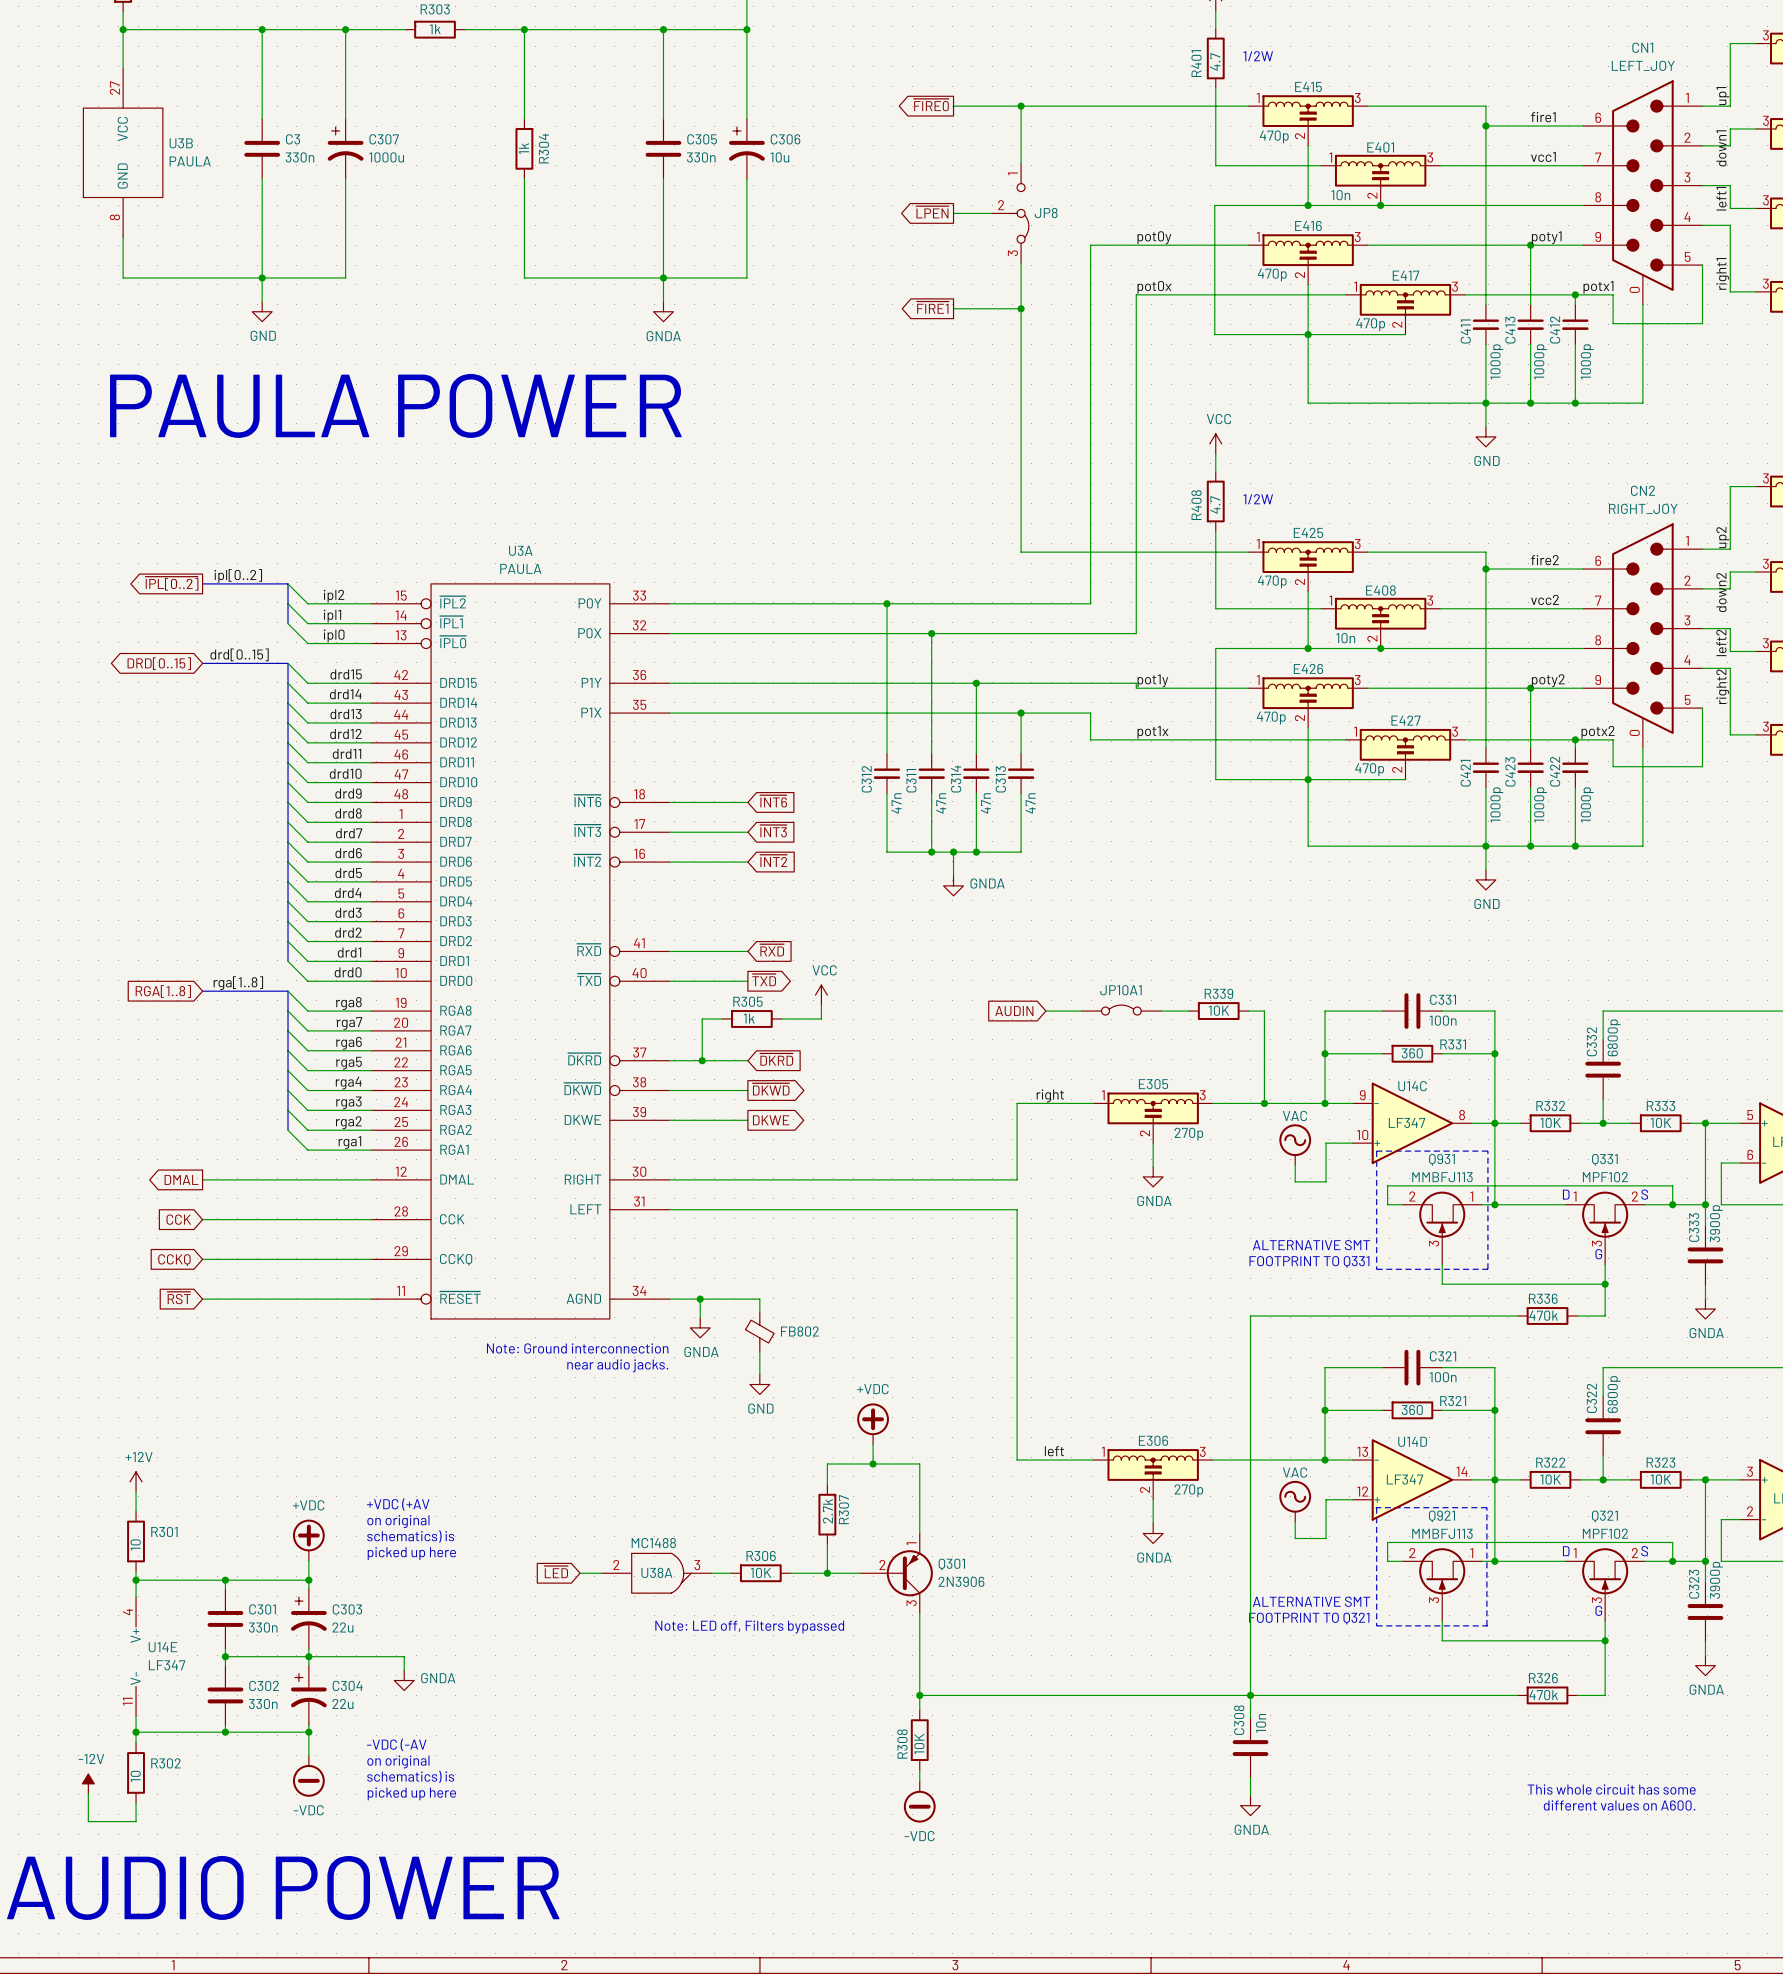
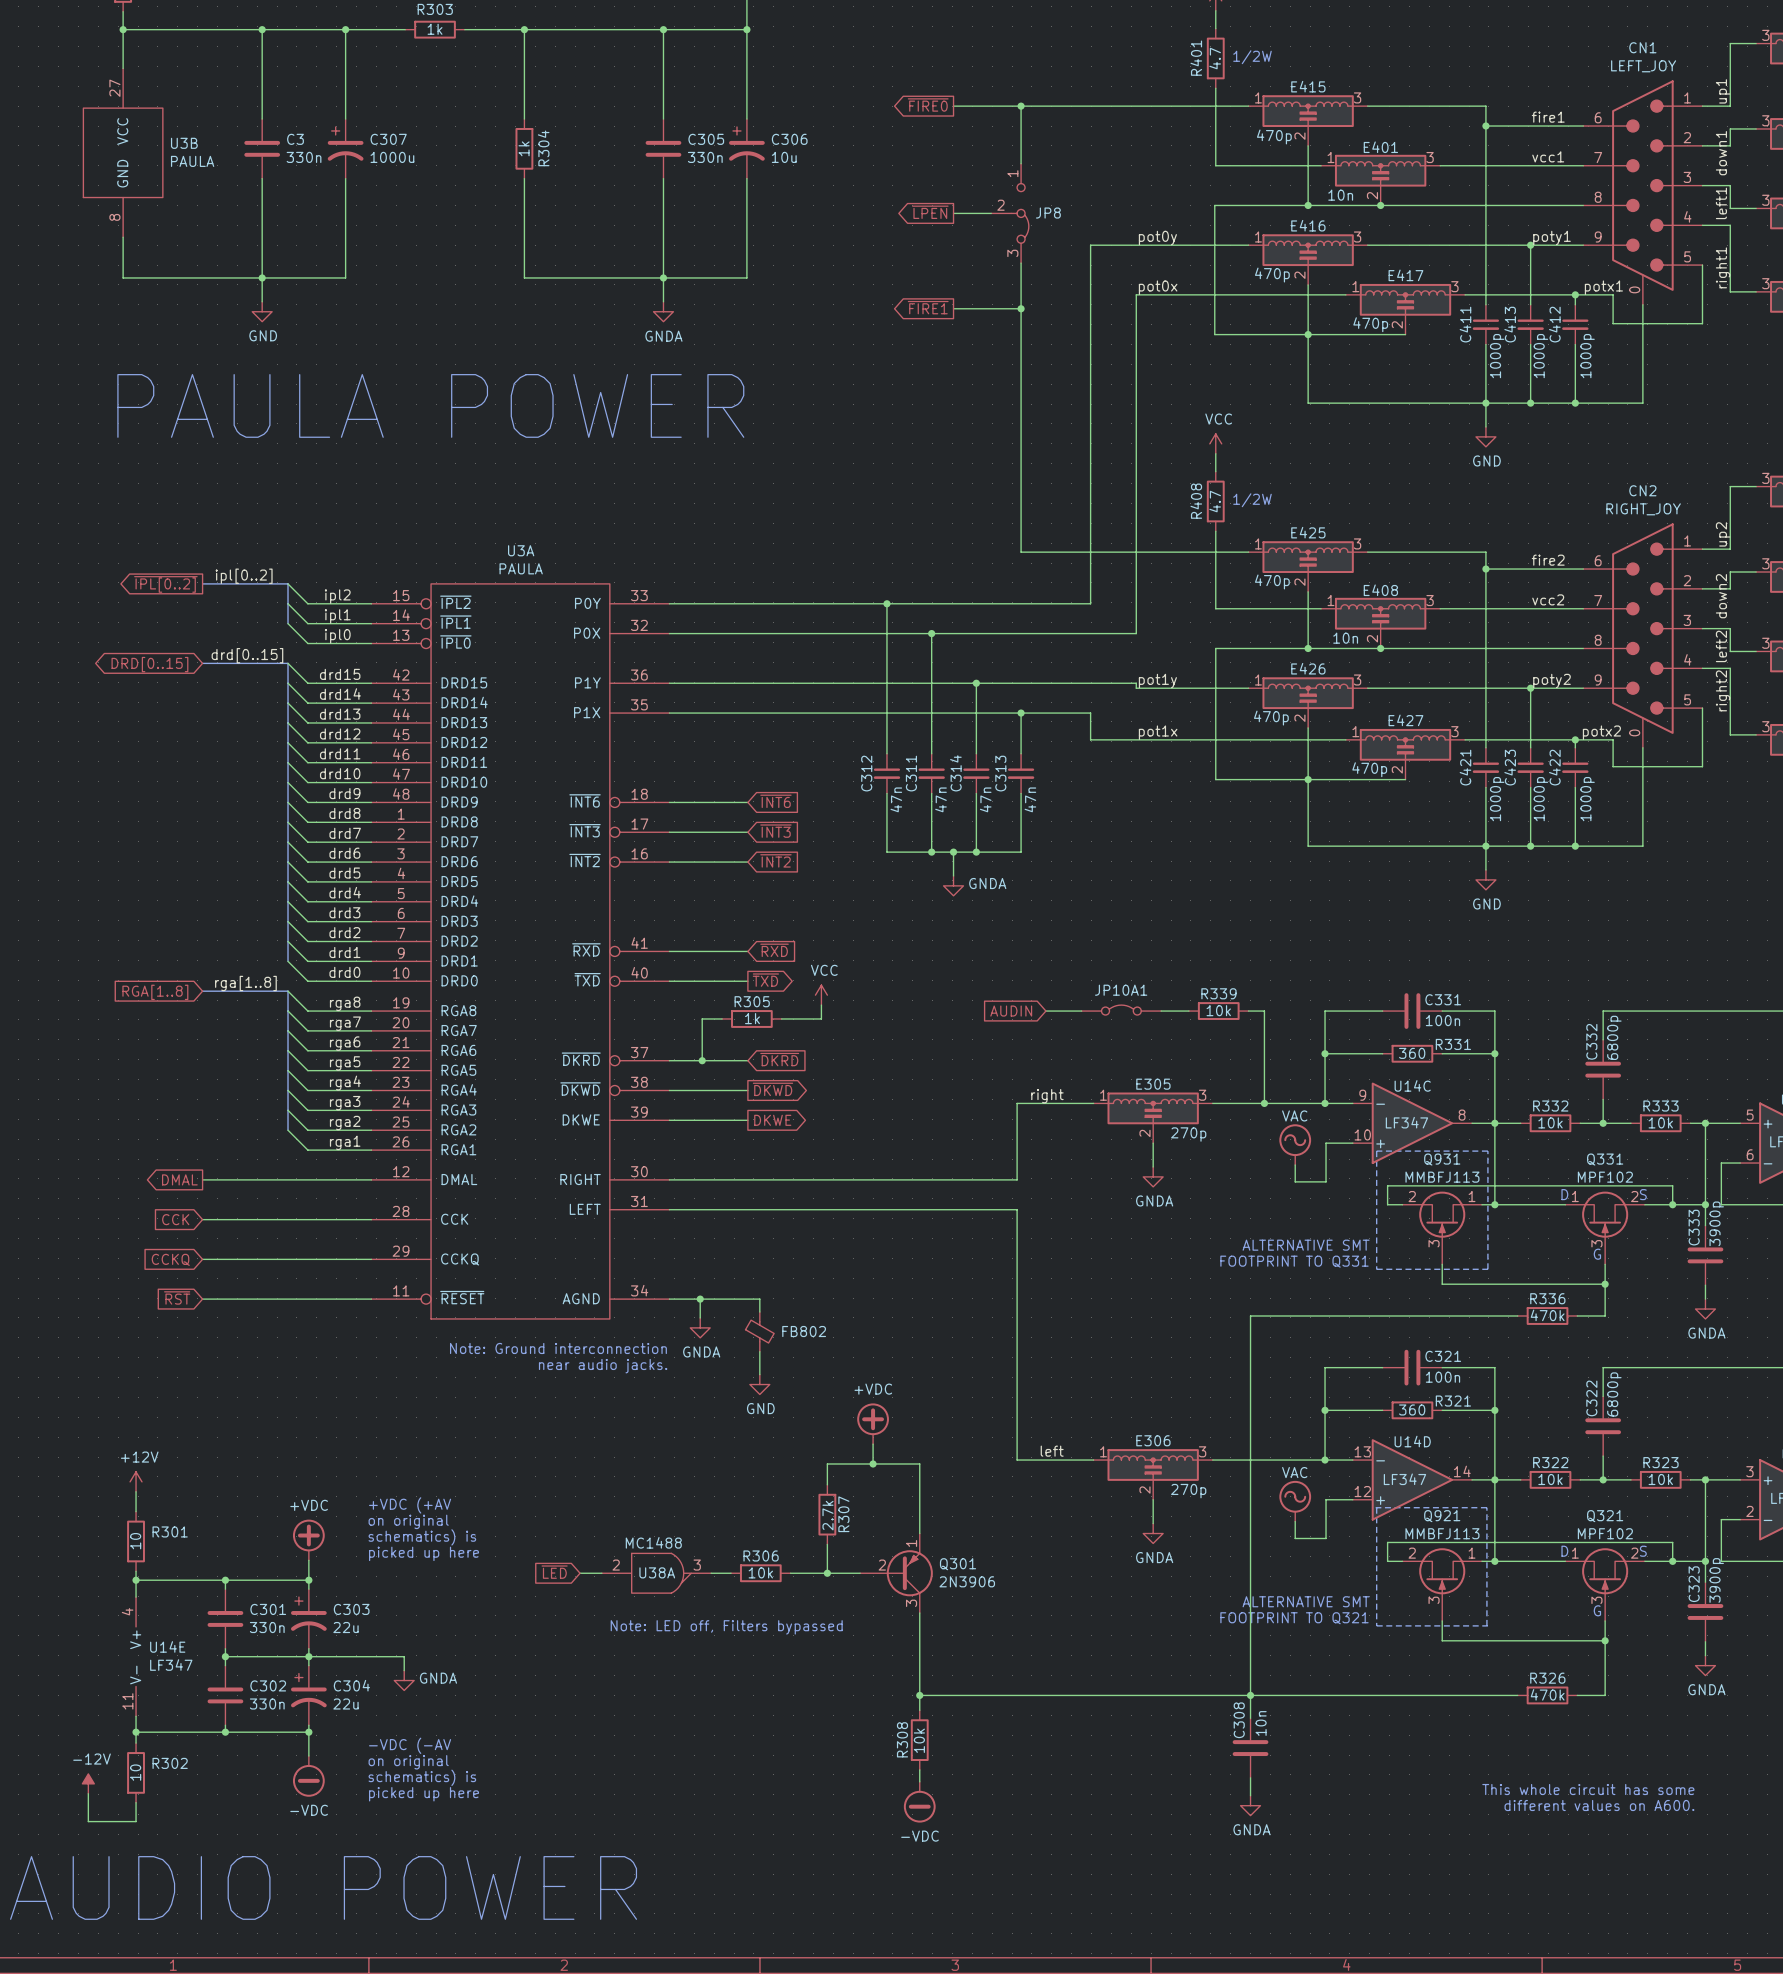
R339 value: 10K (1218, 1010) -> 10k (1218, 1010)
R332 value: 10K (1550, 1122) -> 10k (1550, 1122)
R333 value: 10K (1660, 1122) -> 10k (1660, 1122)
R322 value: 10K (1550, 1479) -> 10k (1550, 1479)
R323 value: 10K (1660, 1479) -> 10k (1660, 1479)
R306 value: 10K (761, 1572) -> 10k (760, 1572)
R308 value: 10K (919, 1743) -> 10k (919, 1740)

